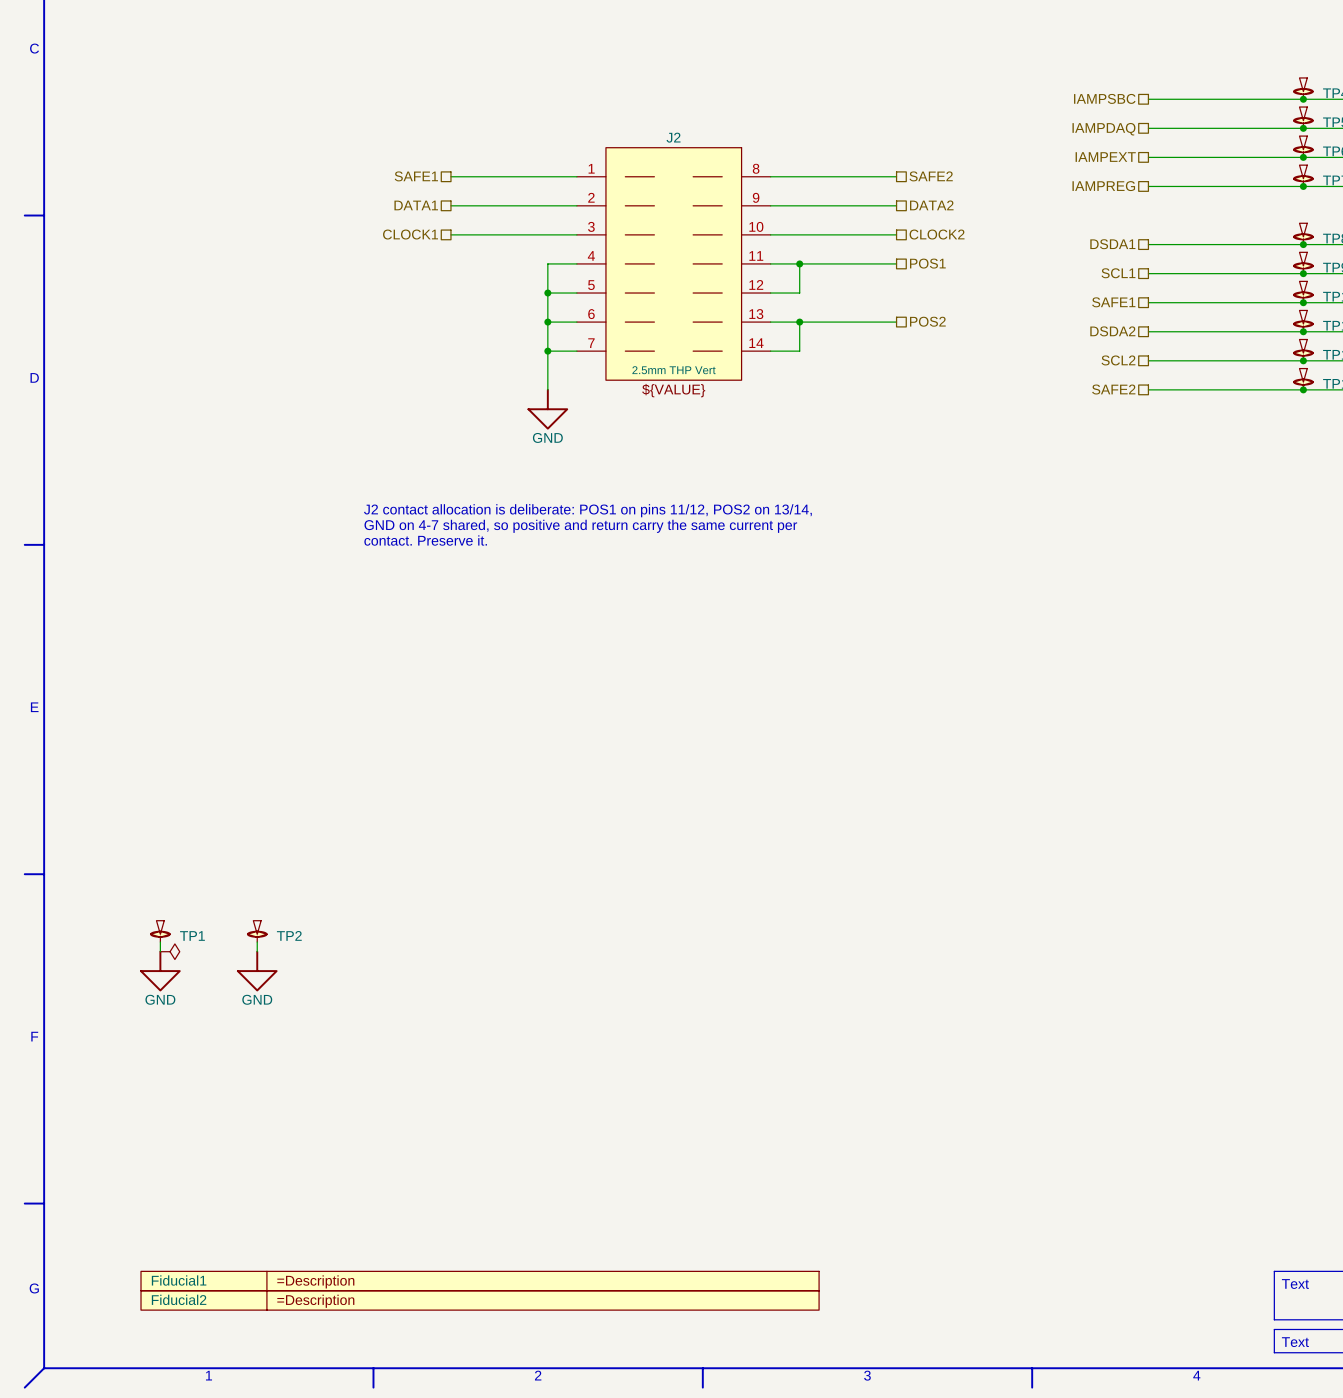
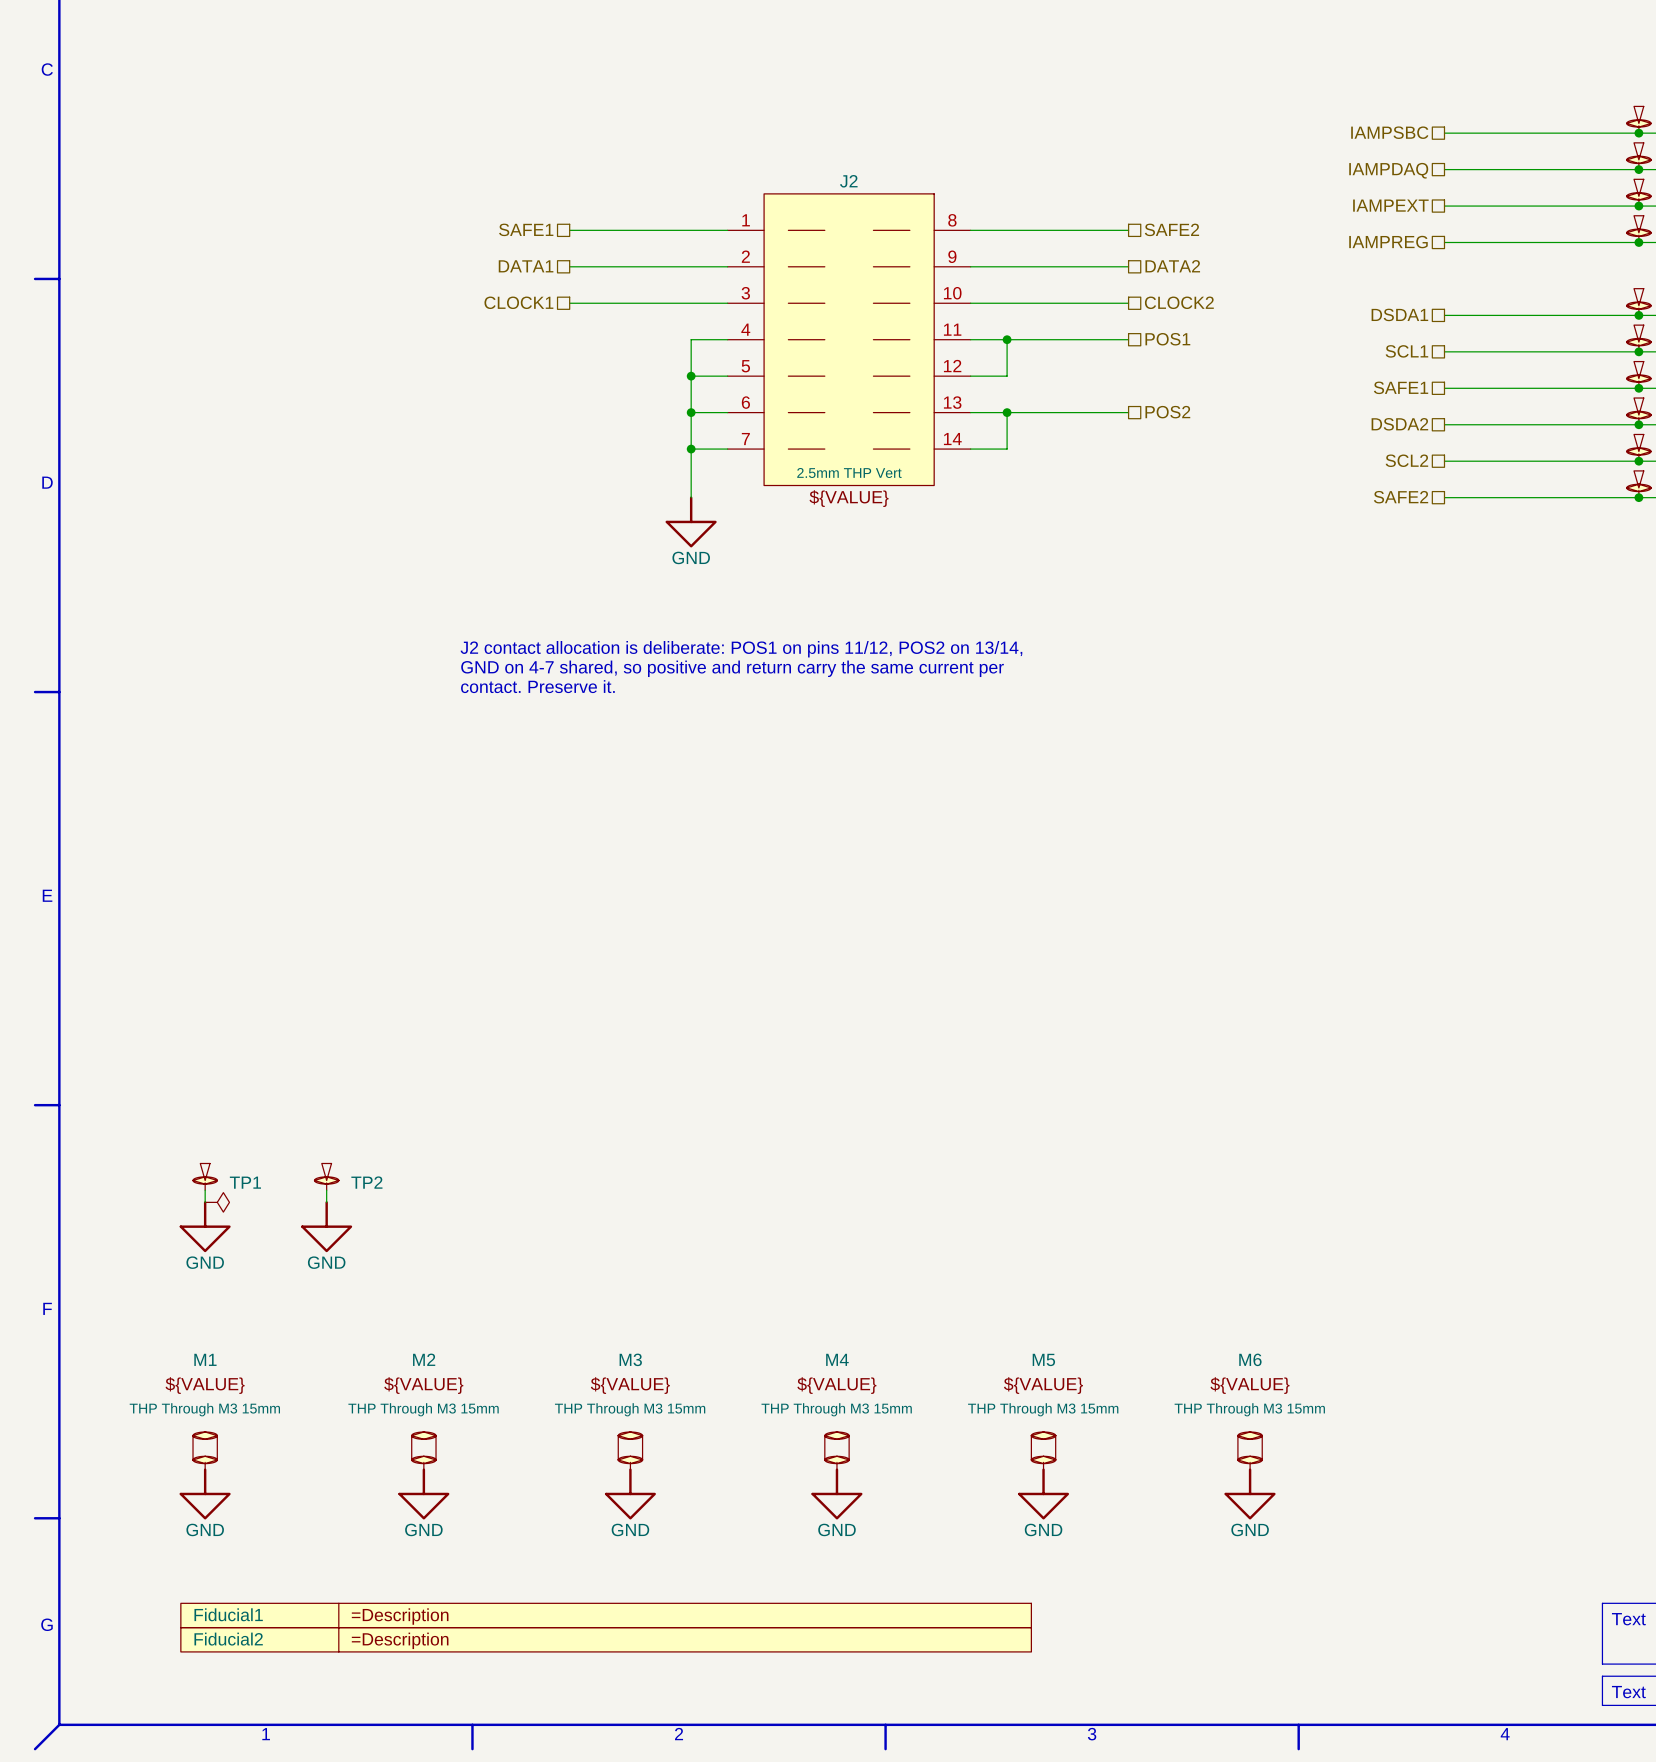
M1: none -> (205, 1450)
M2: none -> (423, 1450)
M3: none -> (630, 1450)
M4: none -> (836, 1450)
M5: none -> (1043, 1450)
M6: none -> (1250, 1450)
power symbol: none -> GND (205, 1493)
power symbol: none -> GND (423, 1493)
power symbol: none -> GND (630, 1493)
power symbol: none -> GND (836, 1493)
power symbol: none -> GND (1043, 1493)
power symbol: none -> GND (1250, 1493)

